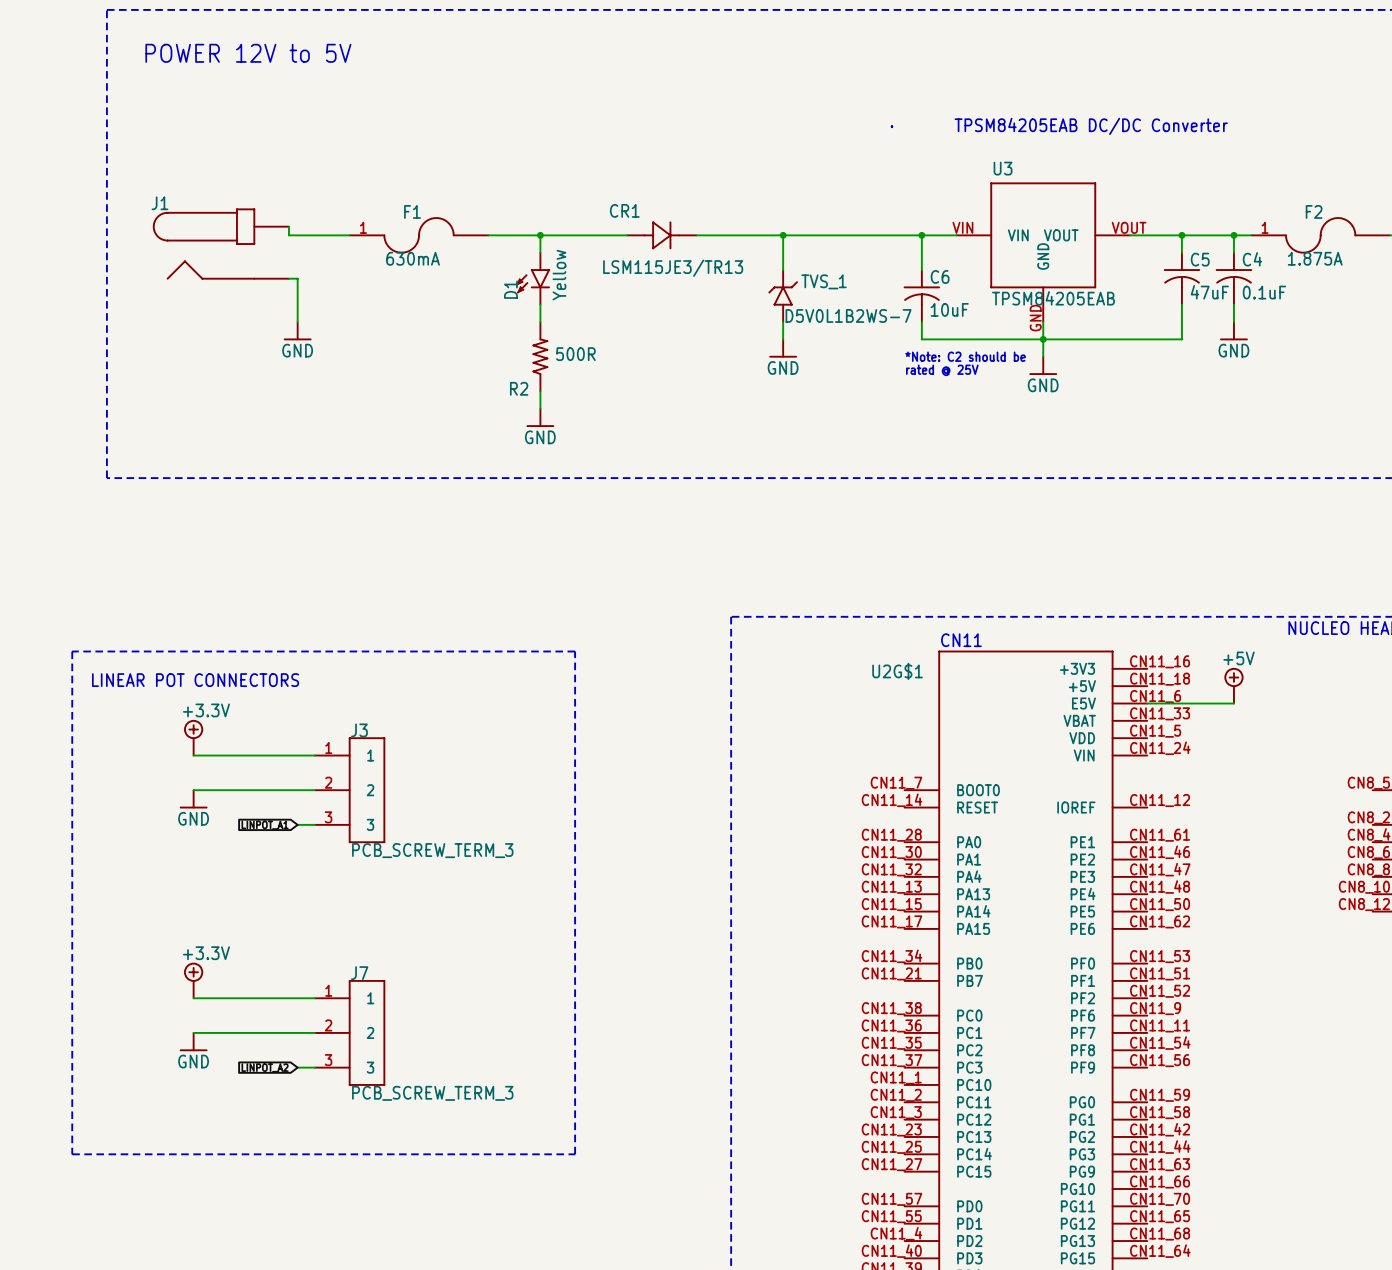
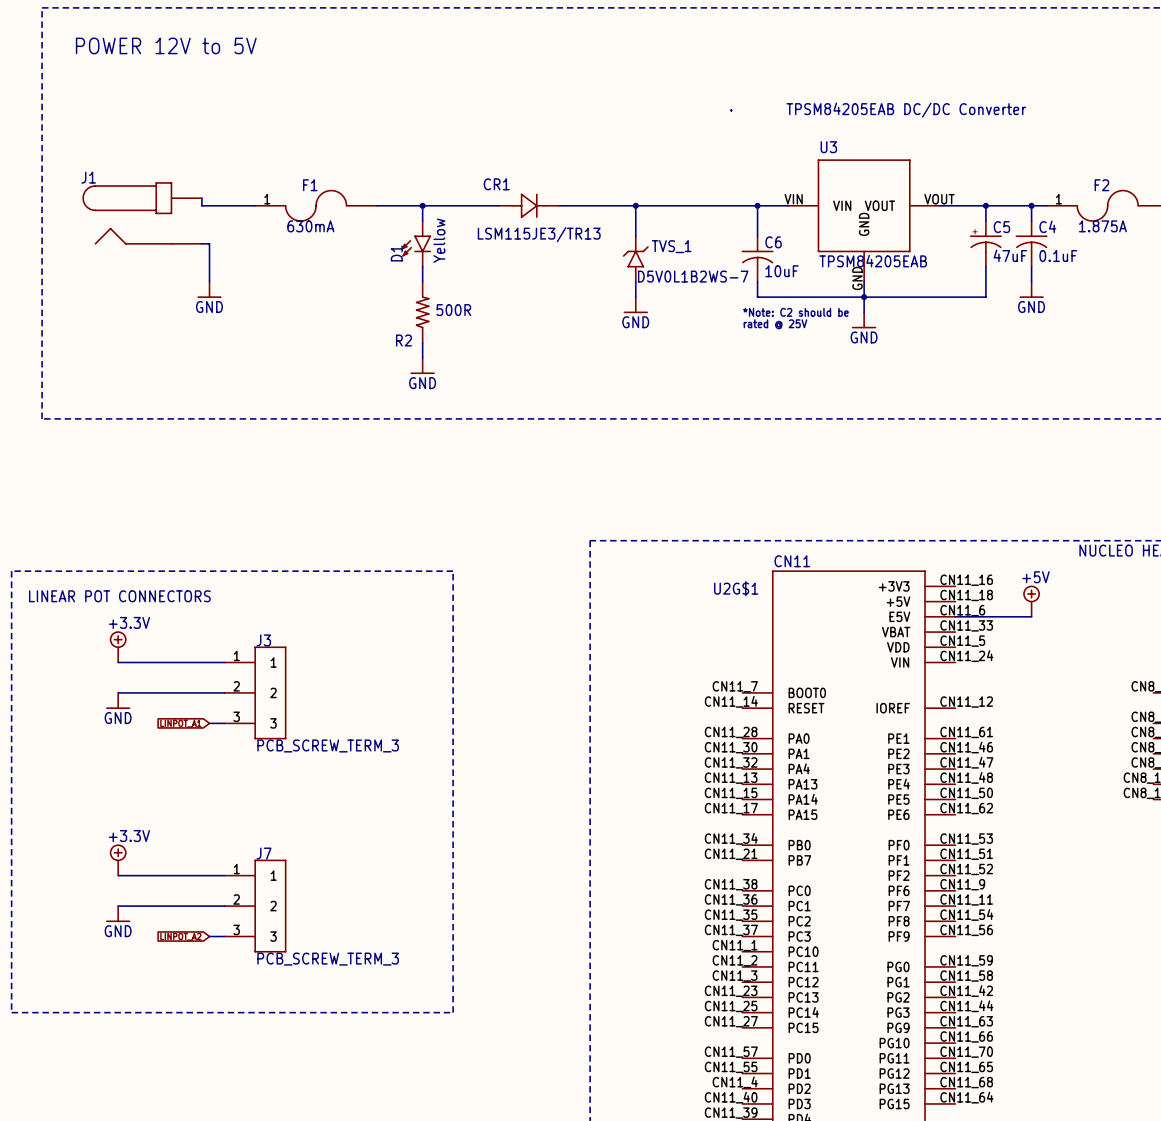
C5 symbol: [1163, 252, 1201, 305] -> [969, 221, 1002, 267]

